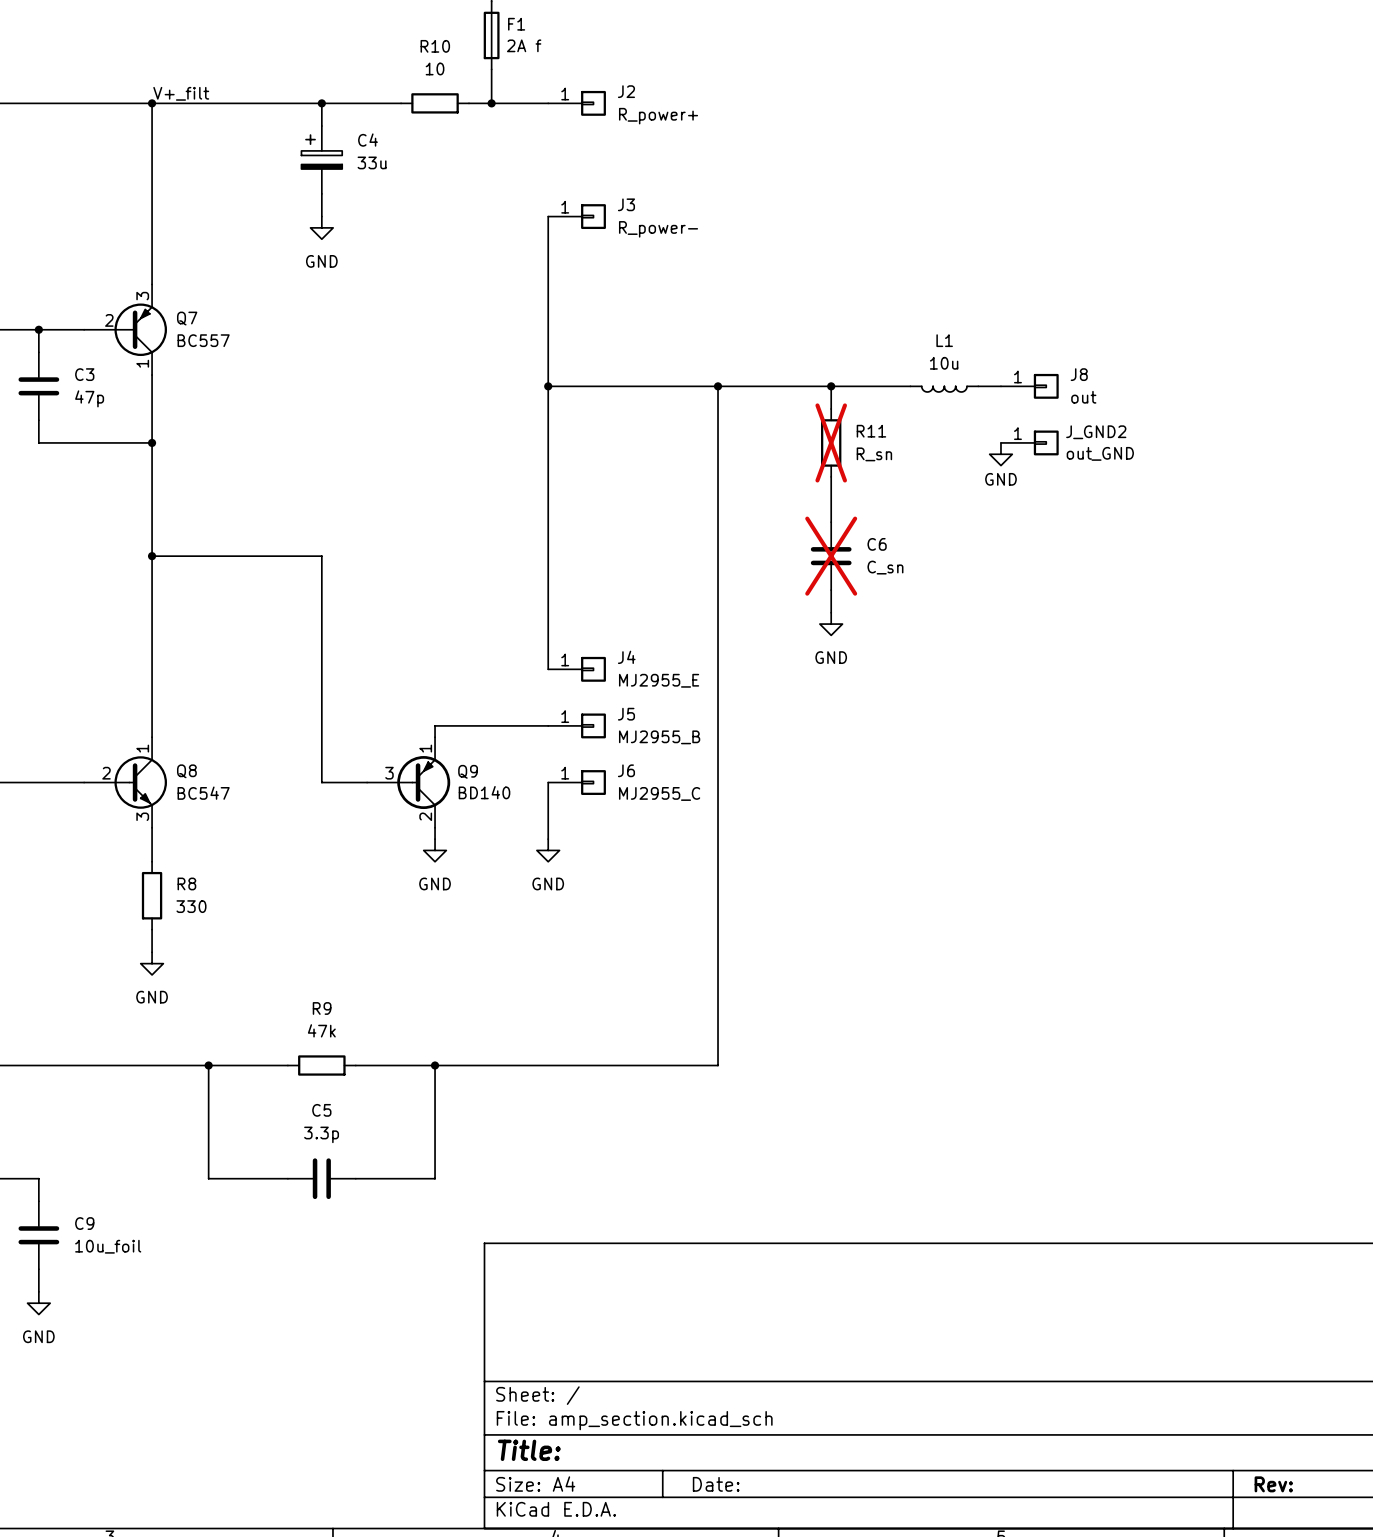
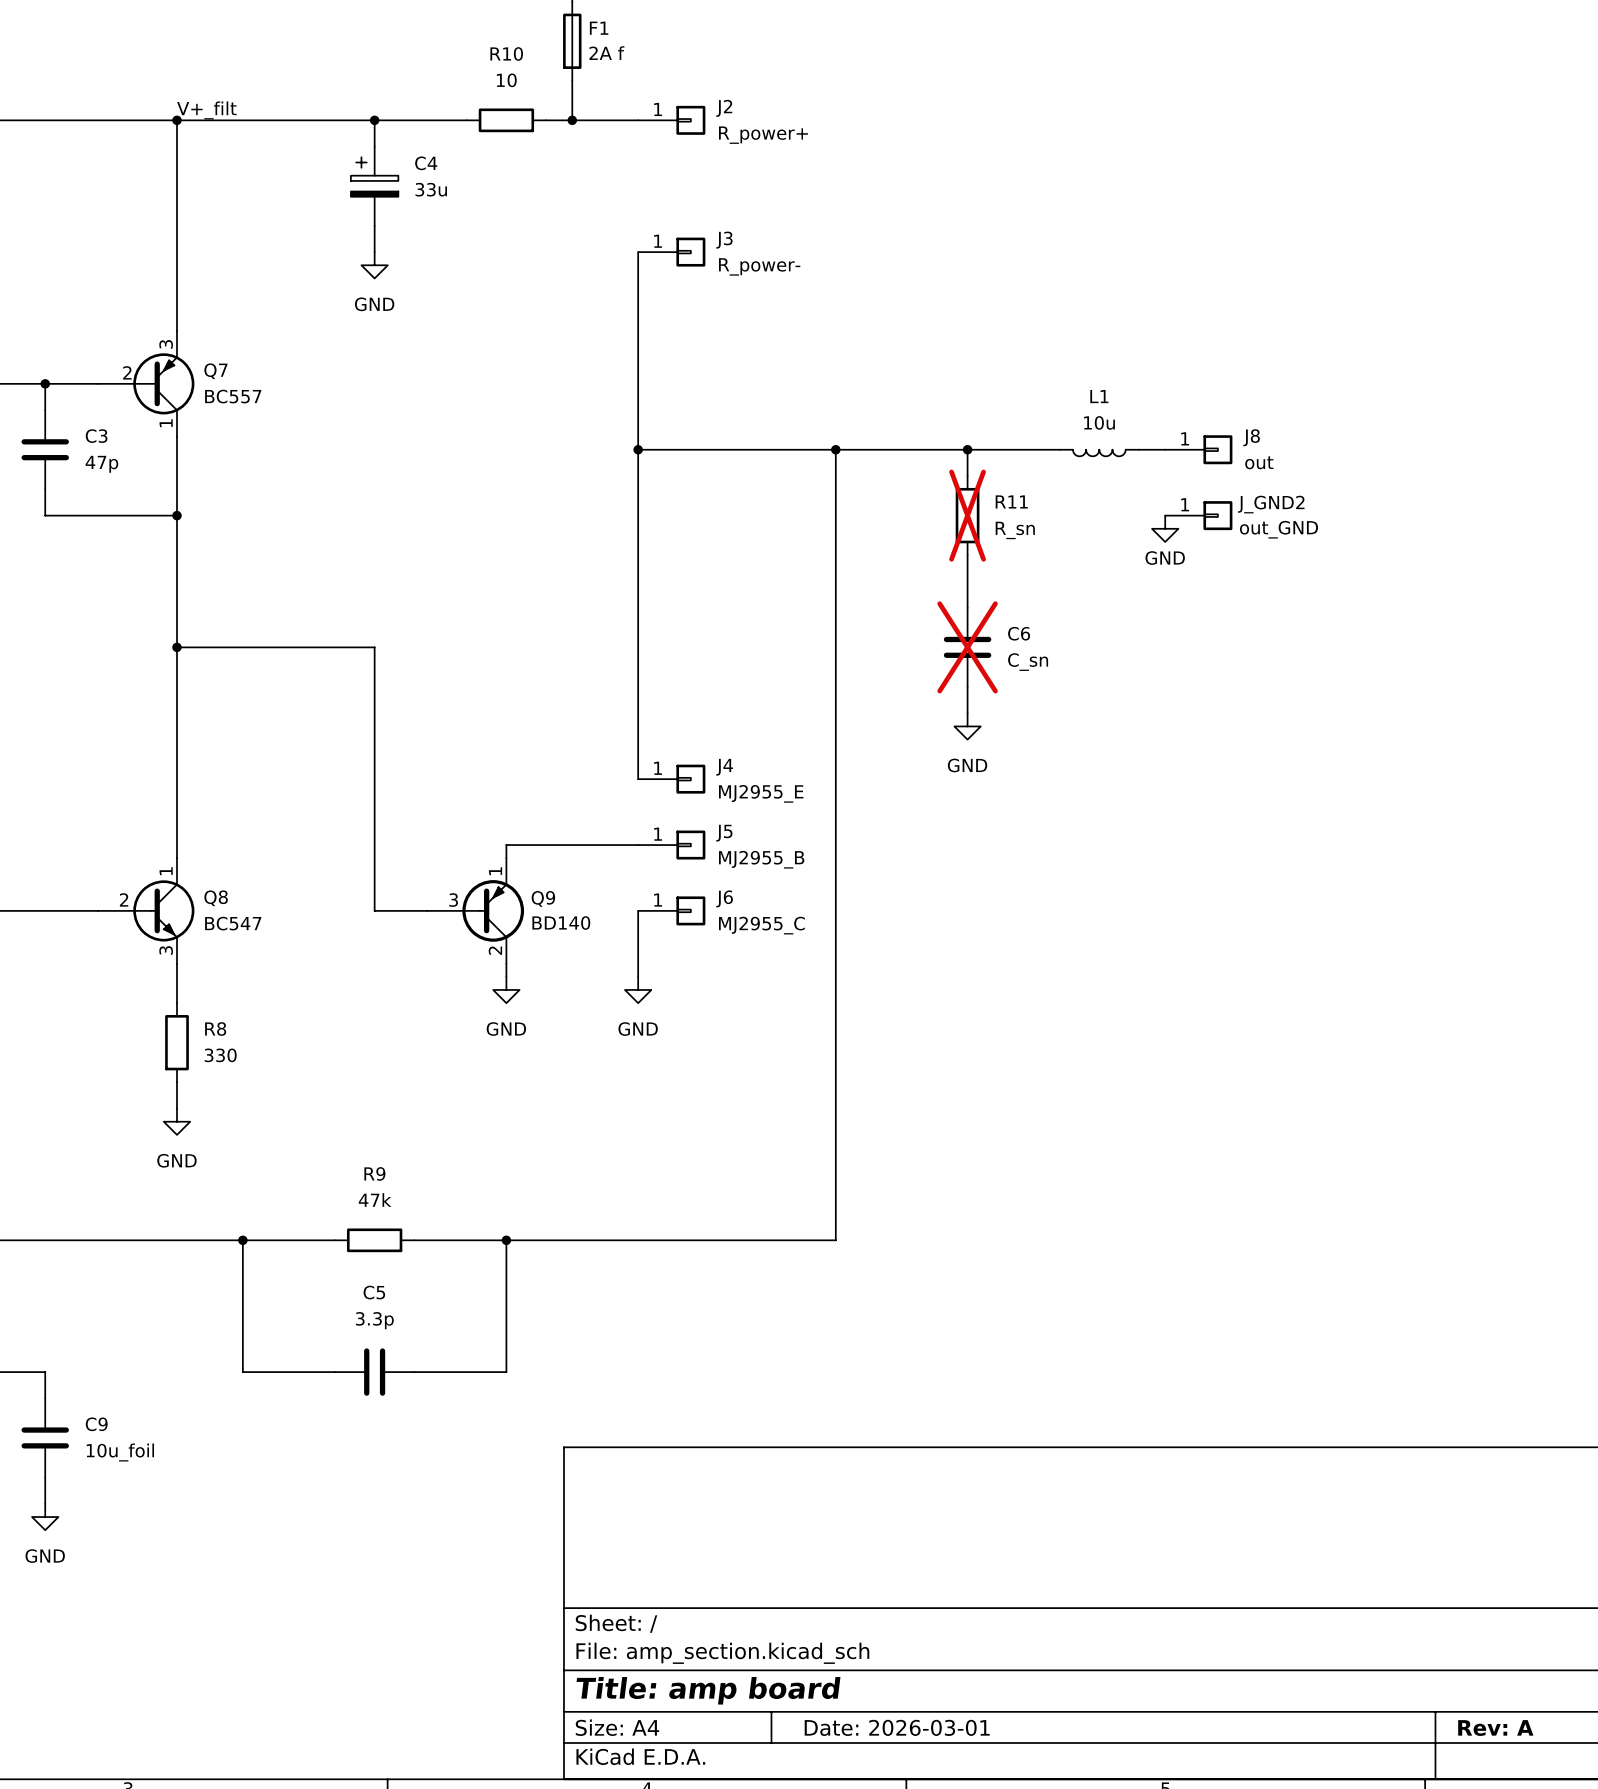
title block: Title: (529, 1450) -> Title: amp board (708, 1690)
title block: Date: (716, 1484) -> Date: 2026-03-01 (897, 1727)
title block: Rev: (1273, 1484) -> Rev: A (1495, 1728)

